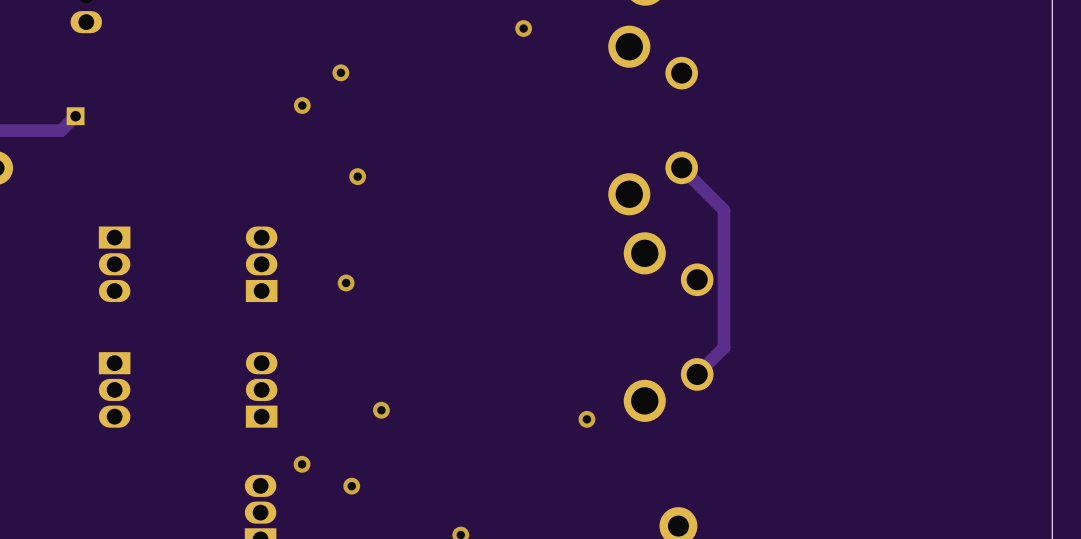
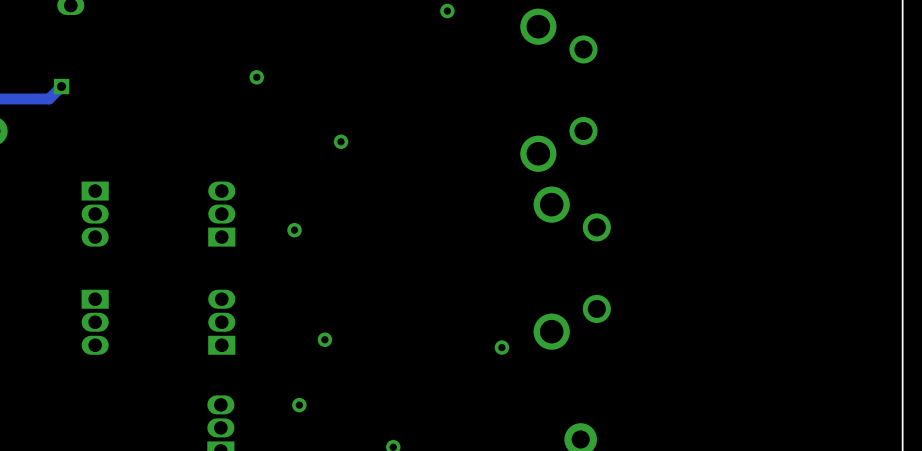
via: (340, 72) -> none
track: (681, 167) (724, 210) (724, 347) (697, 374) -> none
via position: (357, 176) -> (341, 141)
via: (302, 464) -> none

